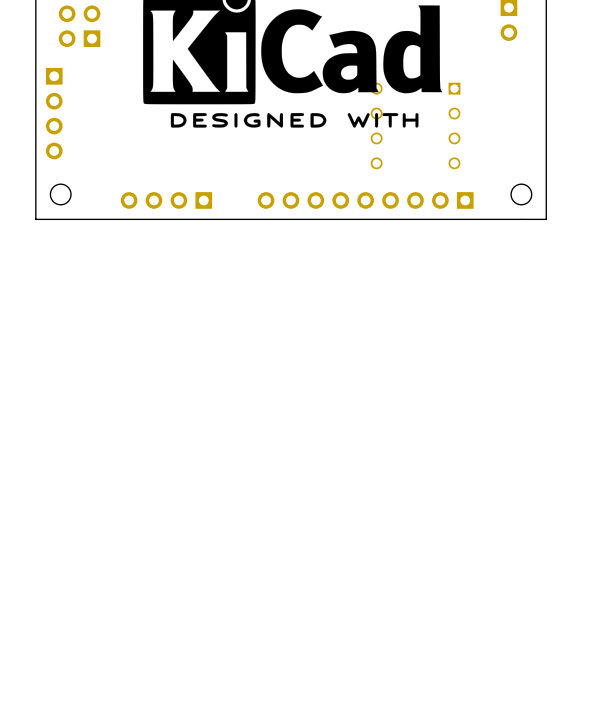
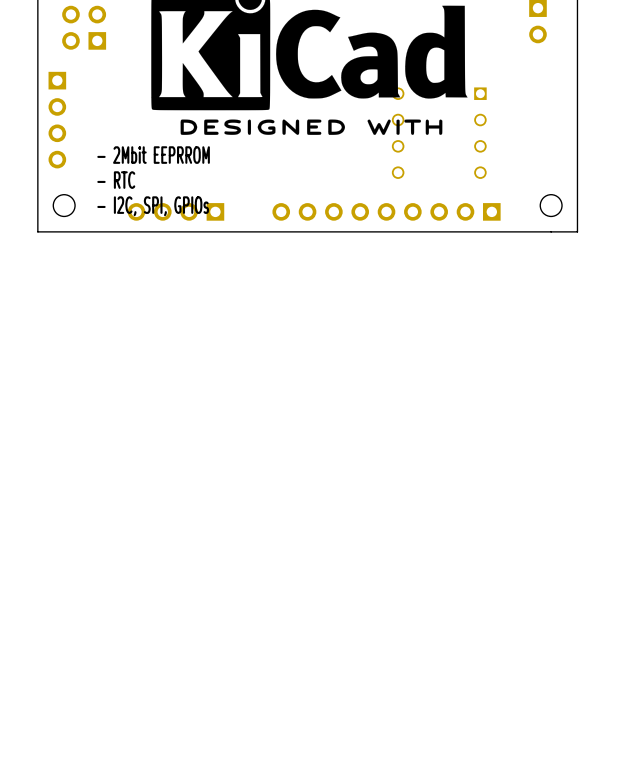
text: none -> - 2Mbit EEPRROM (153, 155)
text: none -> - RTC (116, 180)
text: none -> - I2C, SPI, GPIOs (153, 206)

